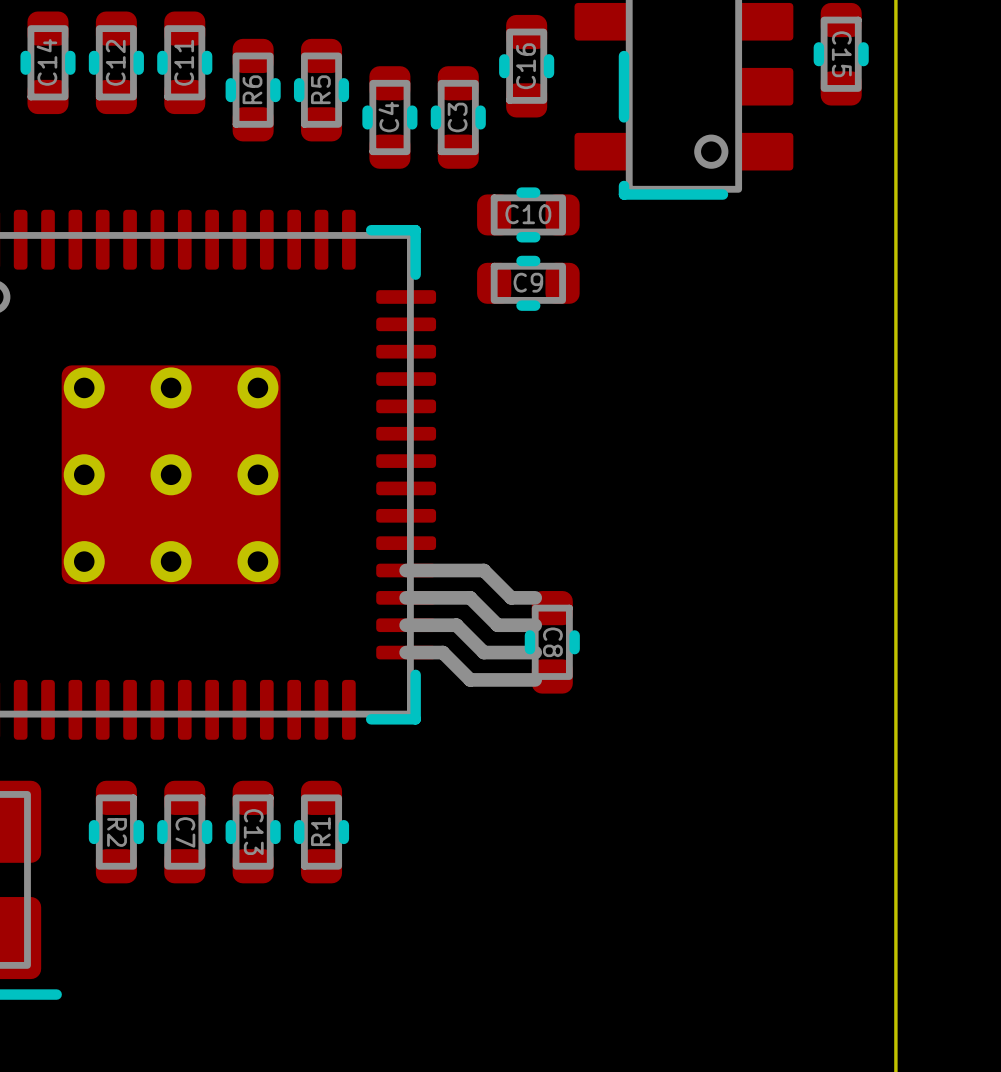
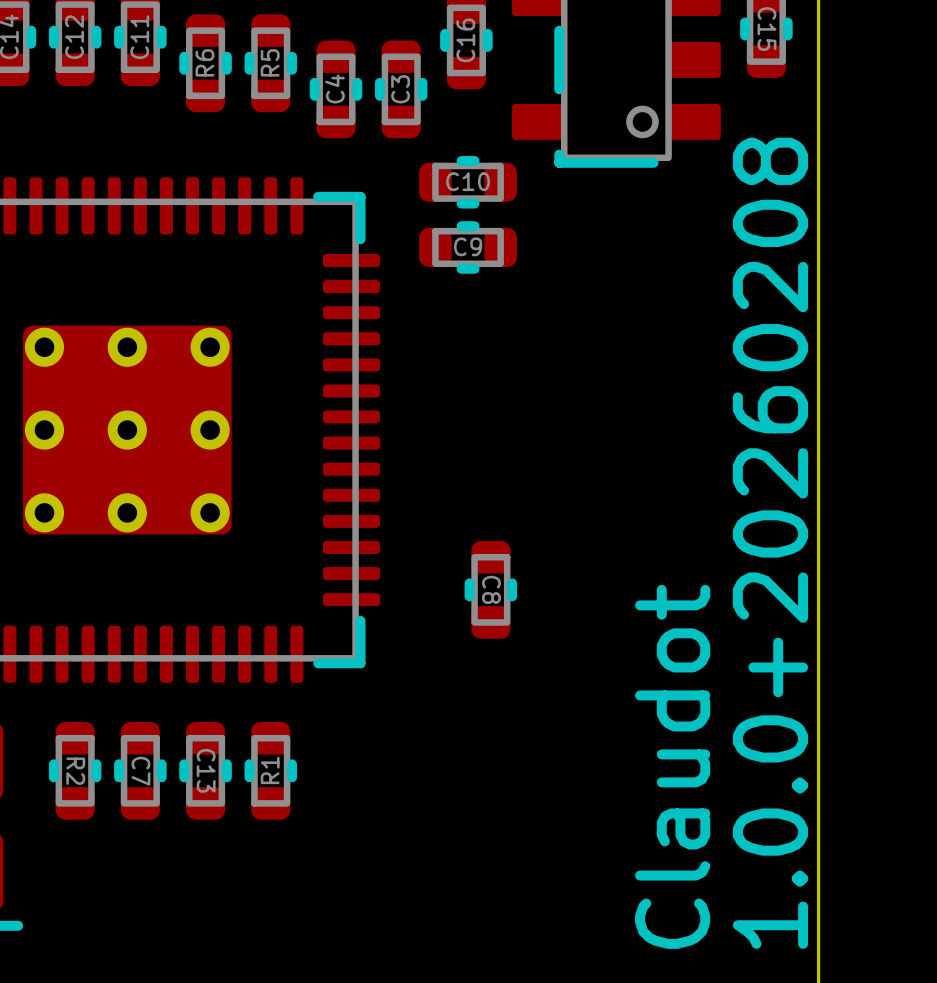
line: (406, 570) (483, 570) (511, 597) (535, 597) -> none
text: none -> 1.0.0+20260208 (770, 543)
line: (406, 597) (470, 597) (497, 625) (535, 625) -> none
line: (406, 625) (456, 625) (483, 652) (535, 652) -> none
line: (406, 652) (442, 652) (470, 679) (535, 679) -> none
text: none -> Claudot (672, 766)

